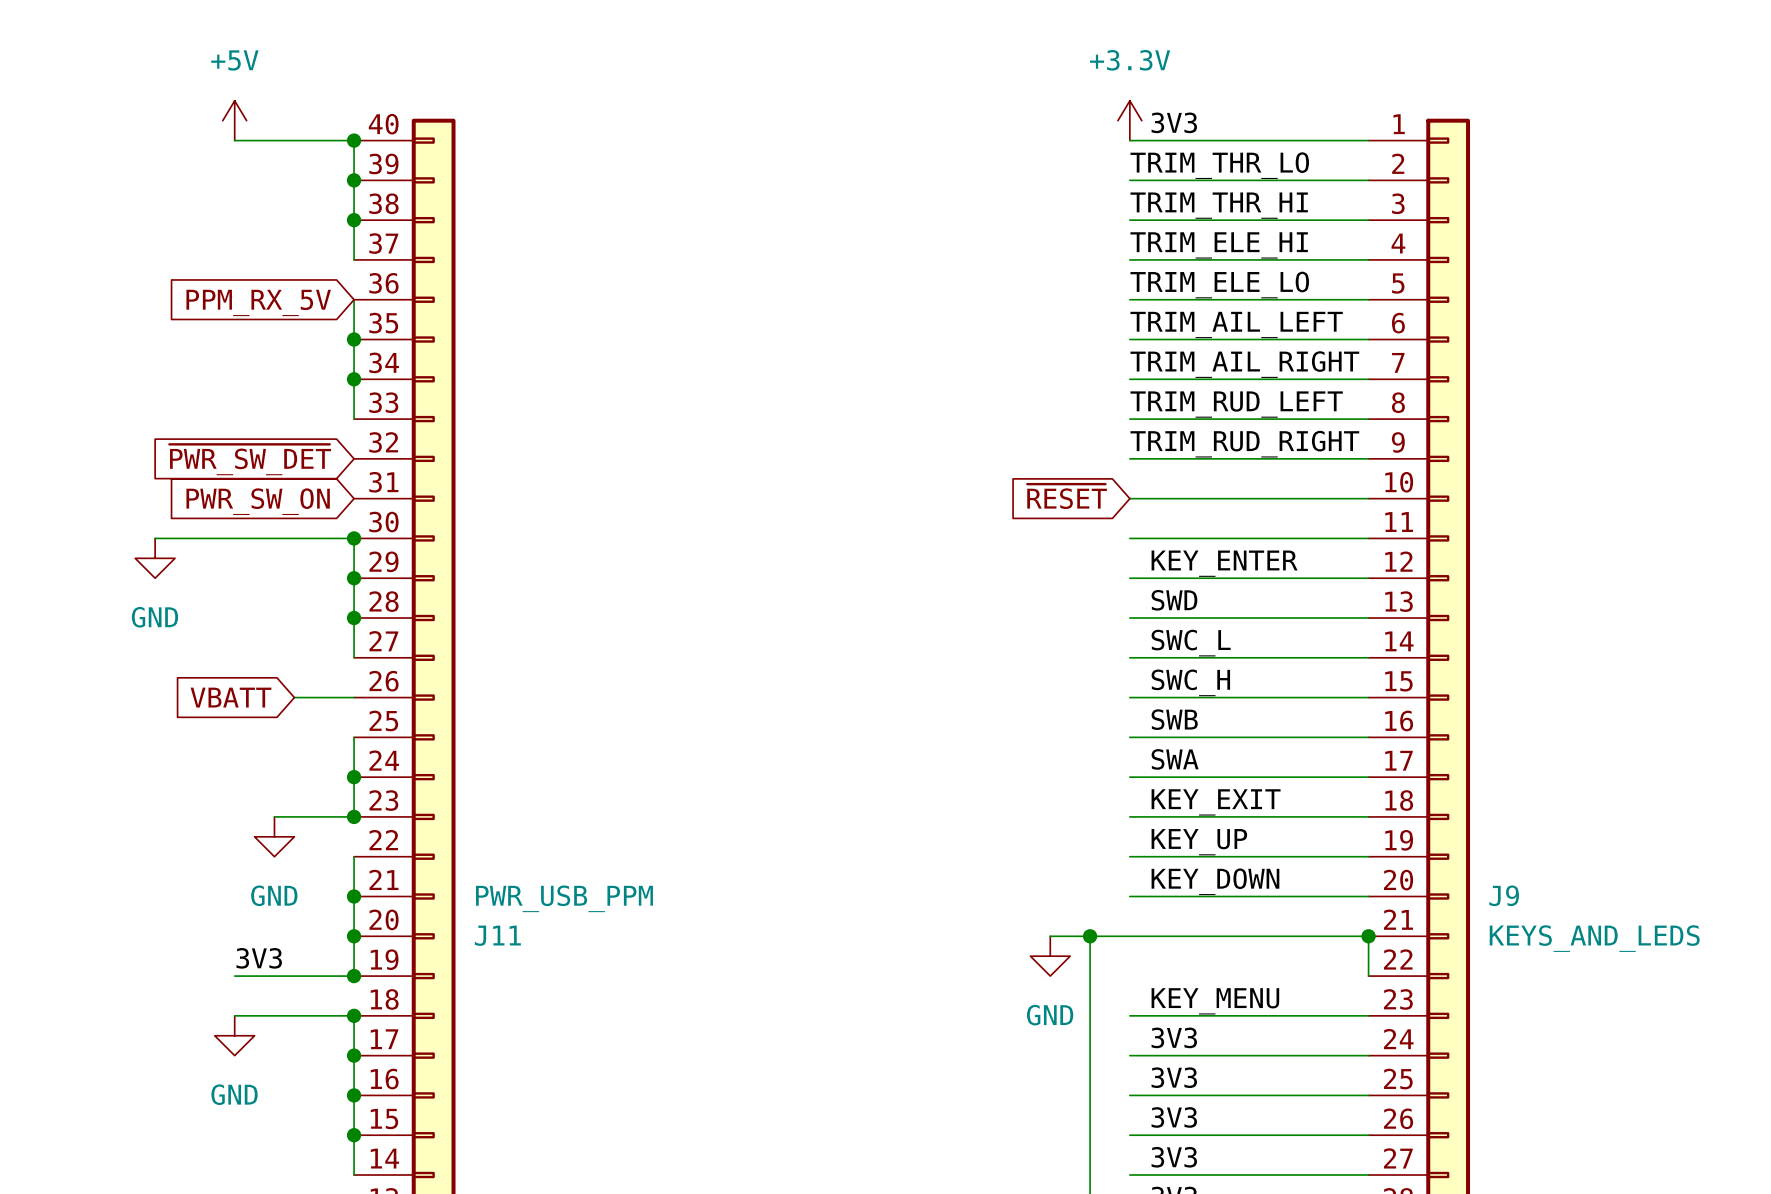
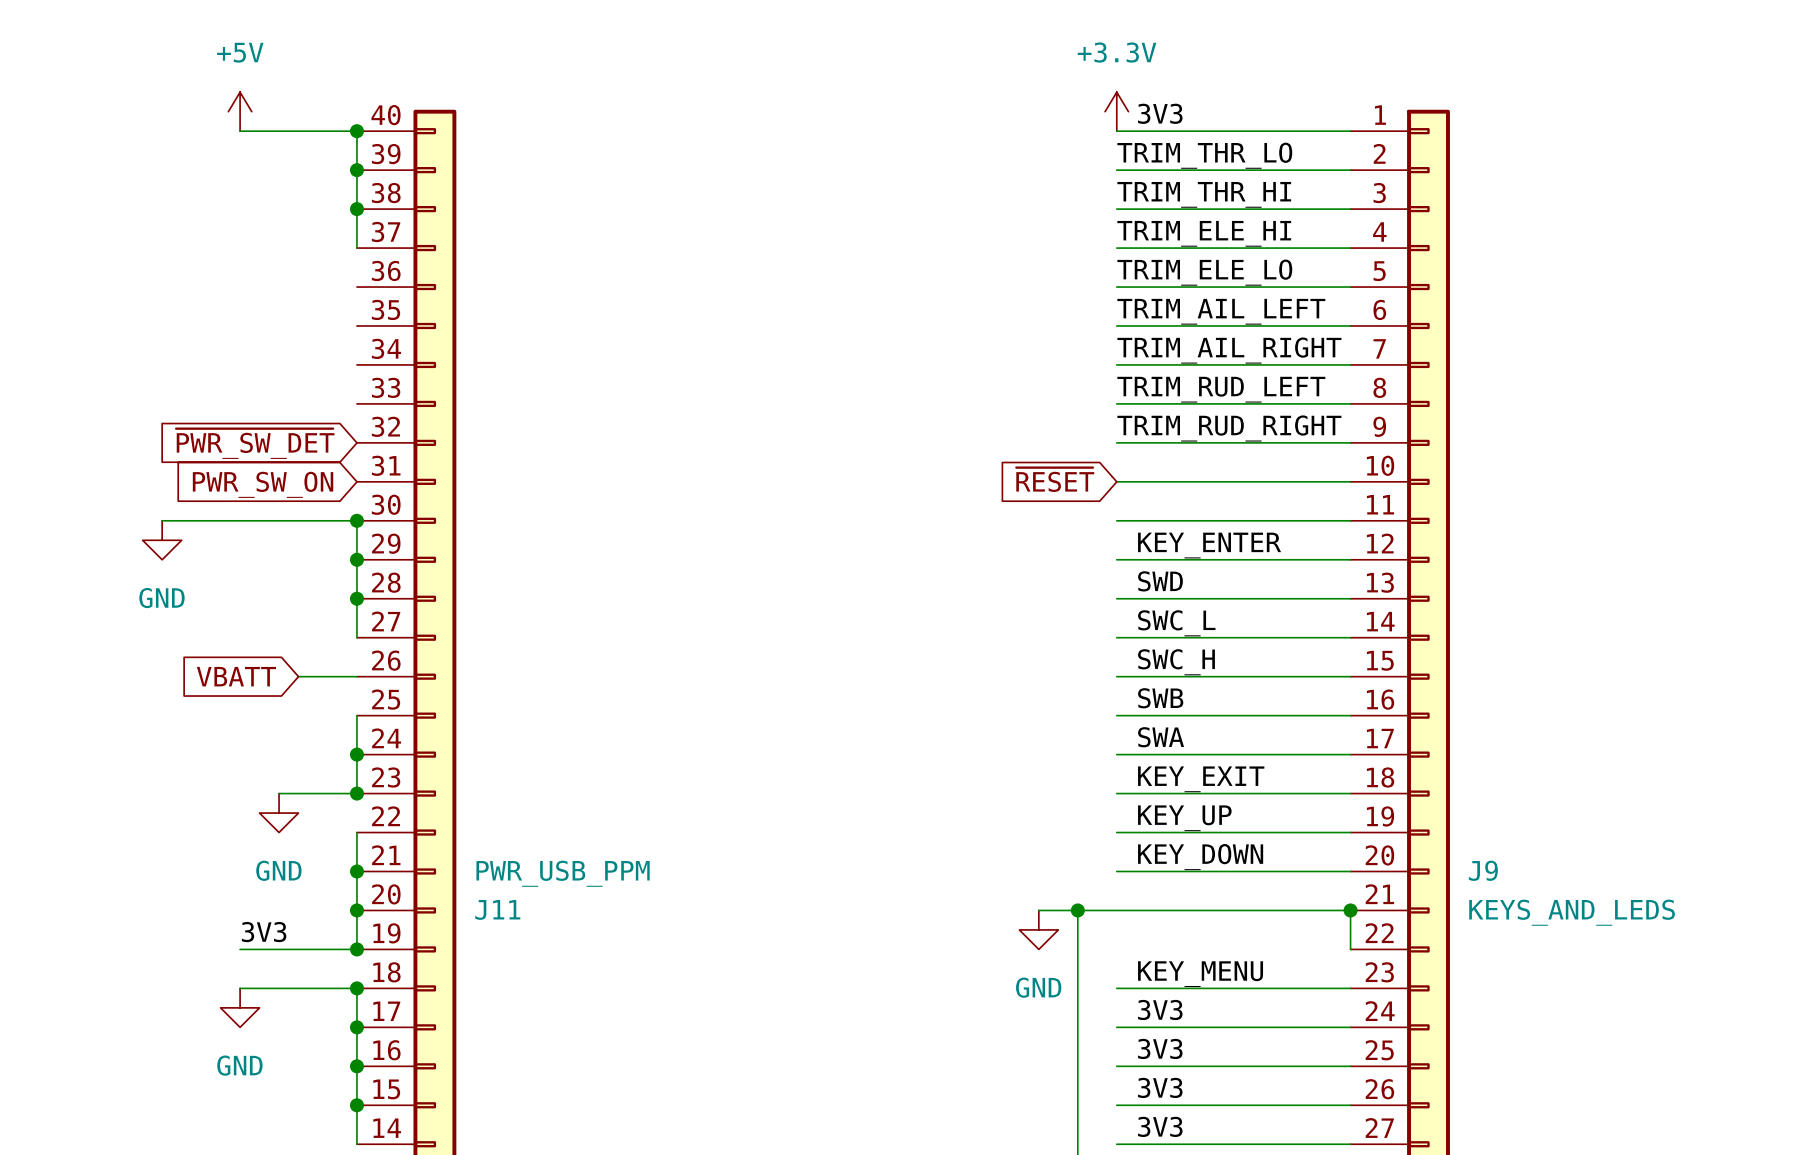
wire: (354, 299) (354, 419) -> none
global label: PPM_RX_5V (258, 302) -> none
junction: (354, 339) -> none
junction: (354, 379) -> none

